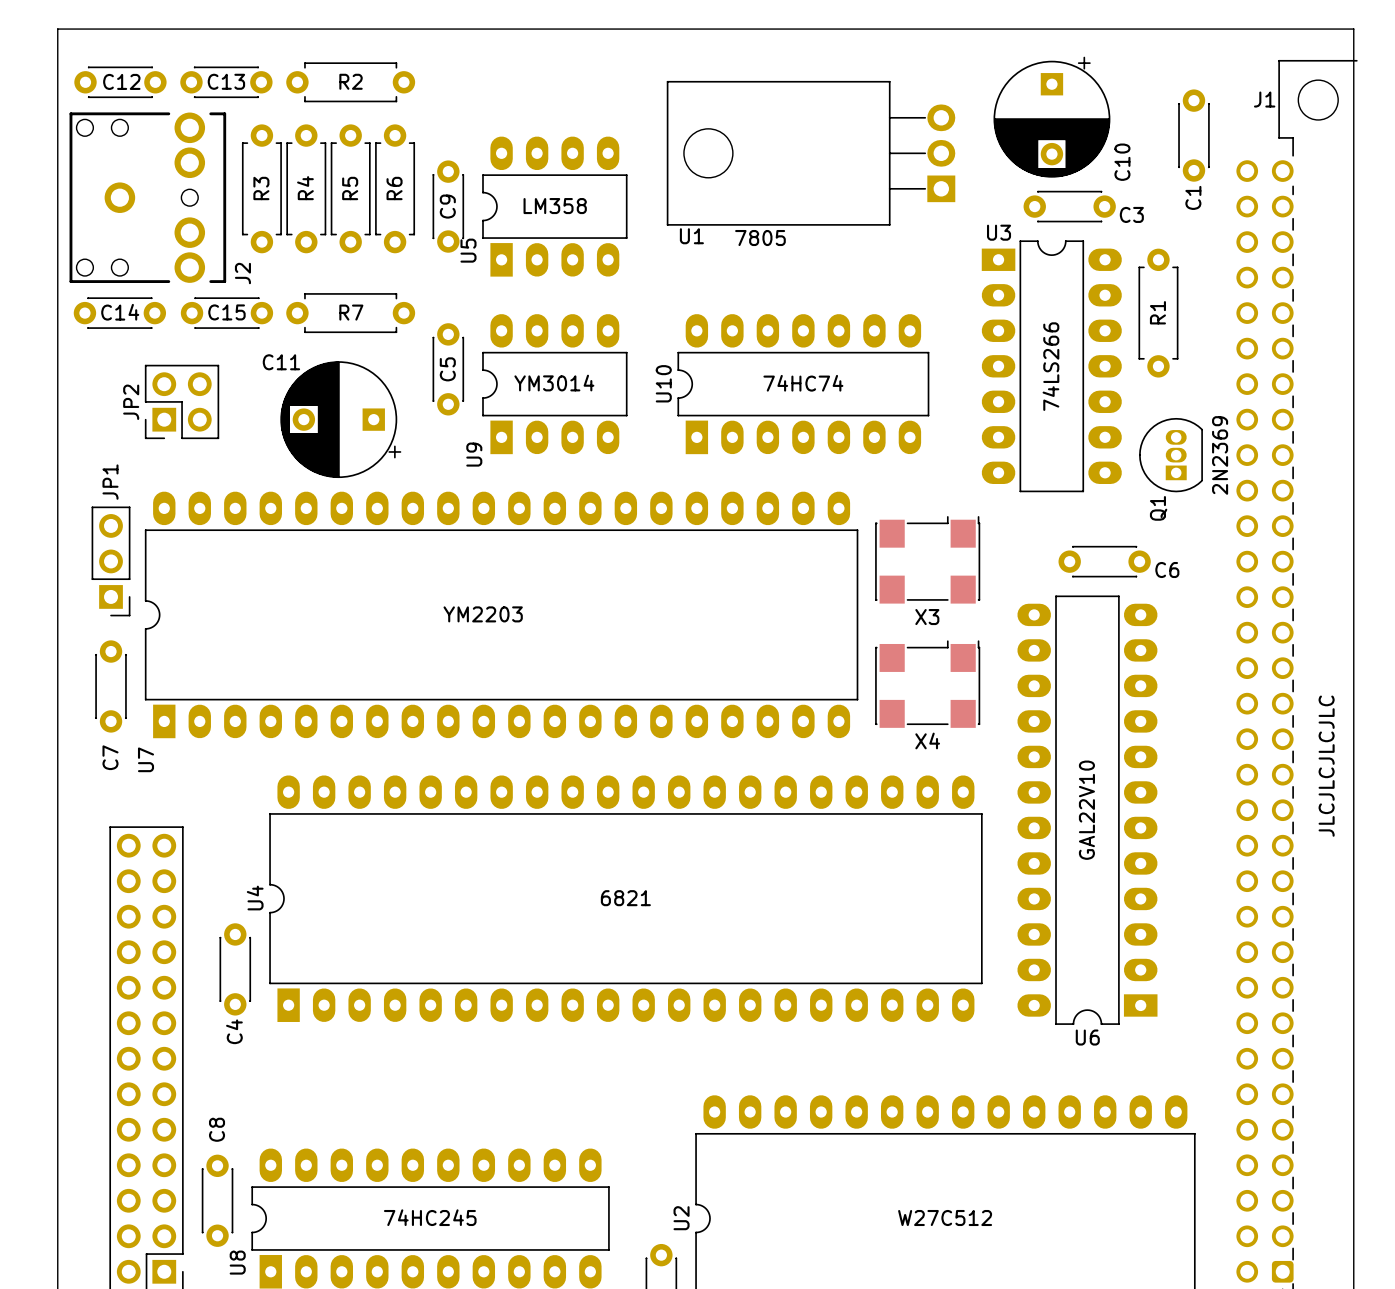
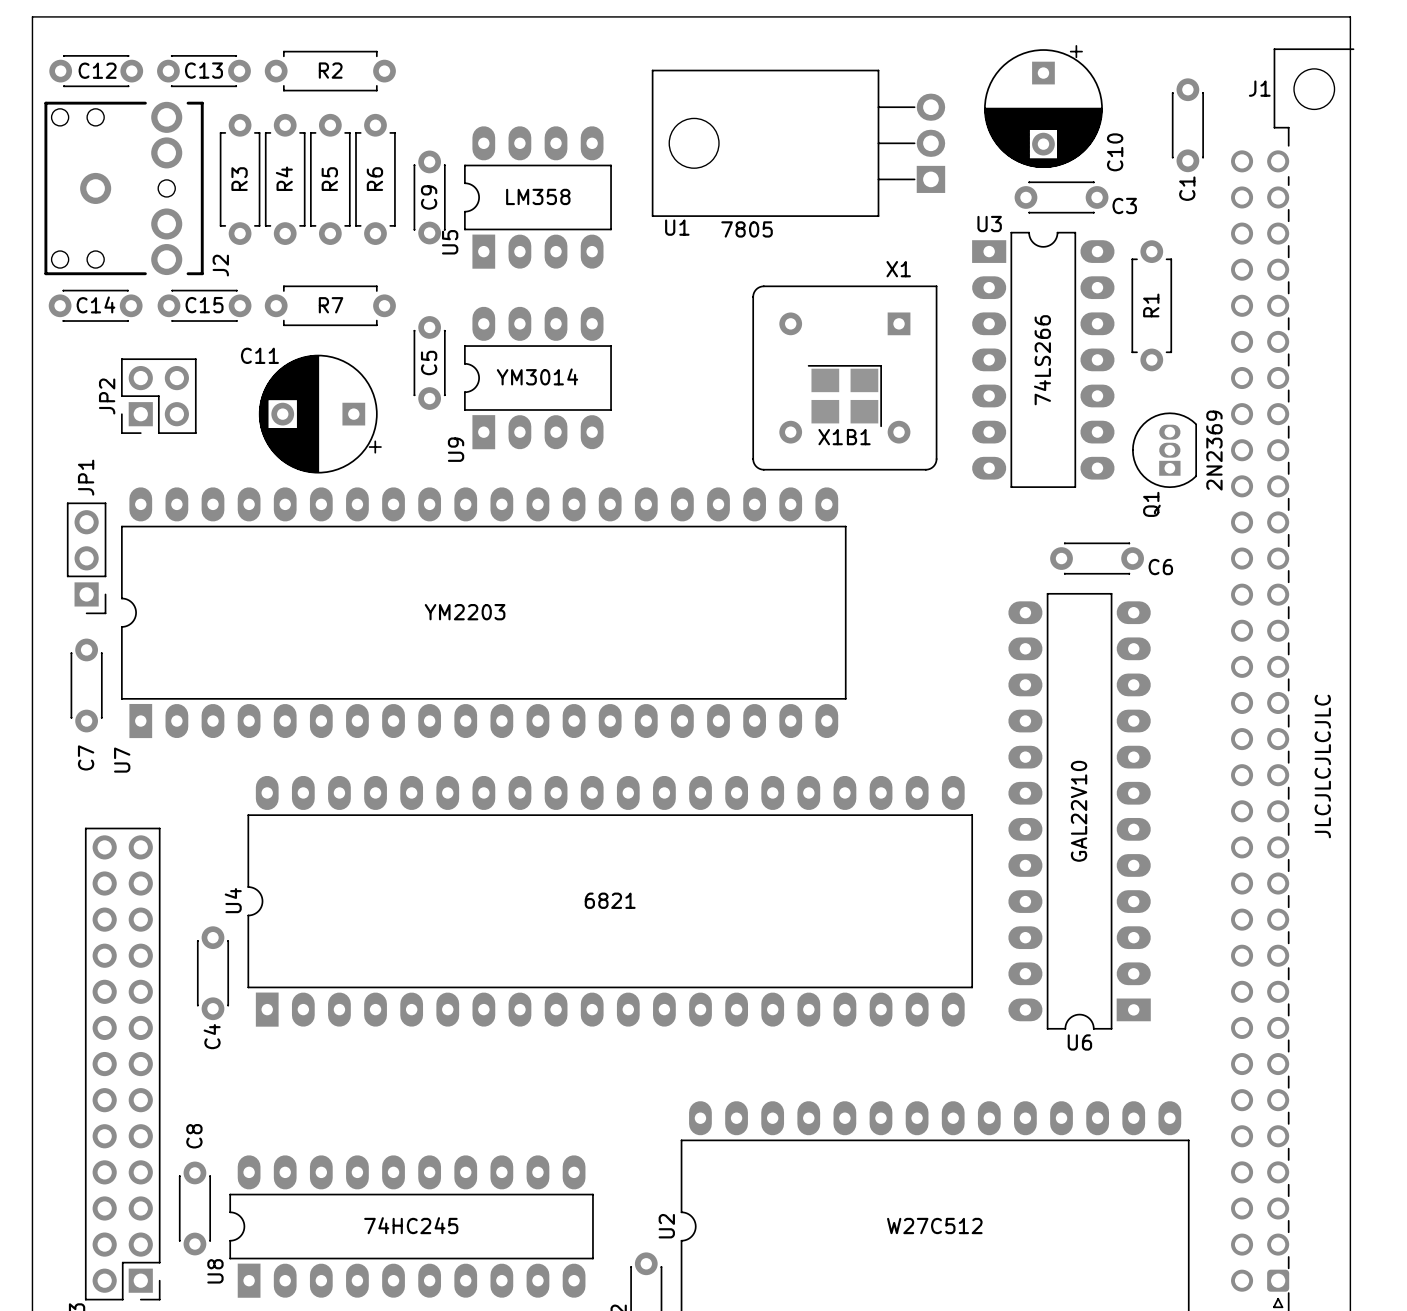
U10: 74HC74 (803, 384) -> none
X1: none -> (844, 378)
X1B1: none -> (844, 396)
X3: (927, 559) -> none
X4: (927, 684) -> none

